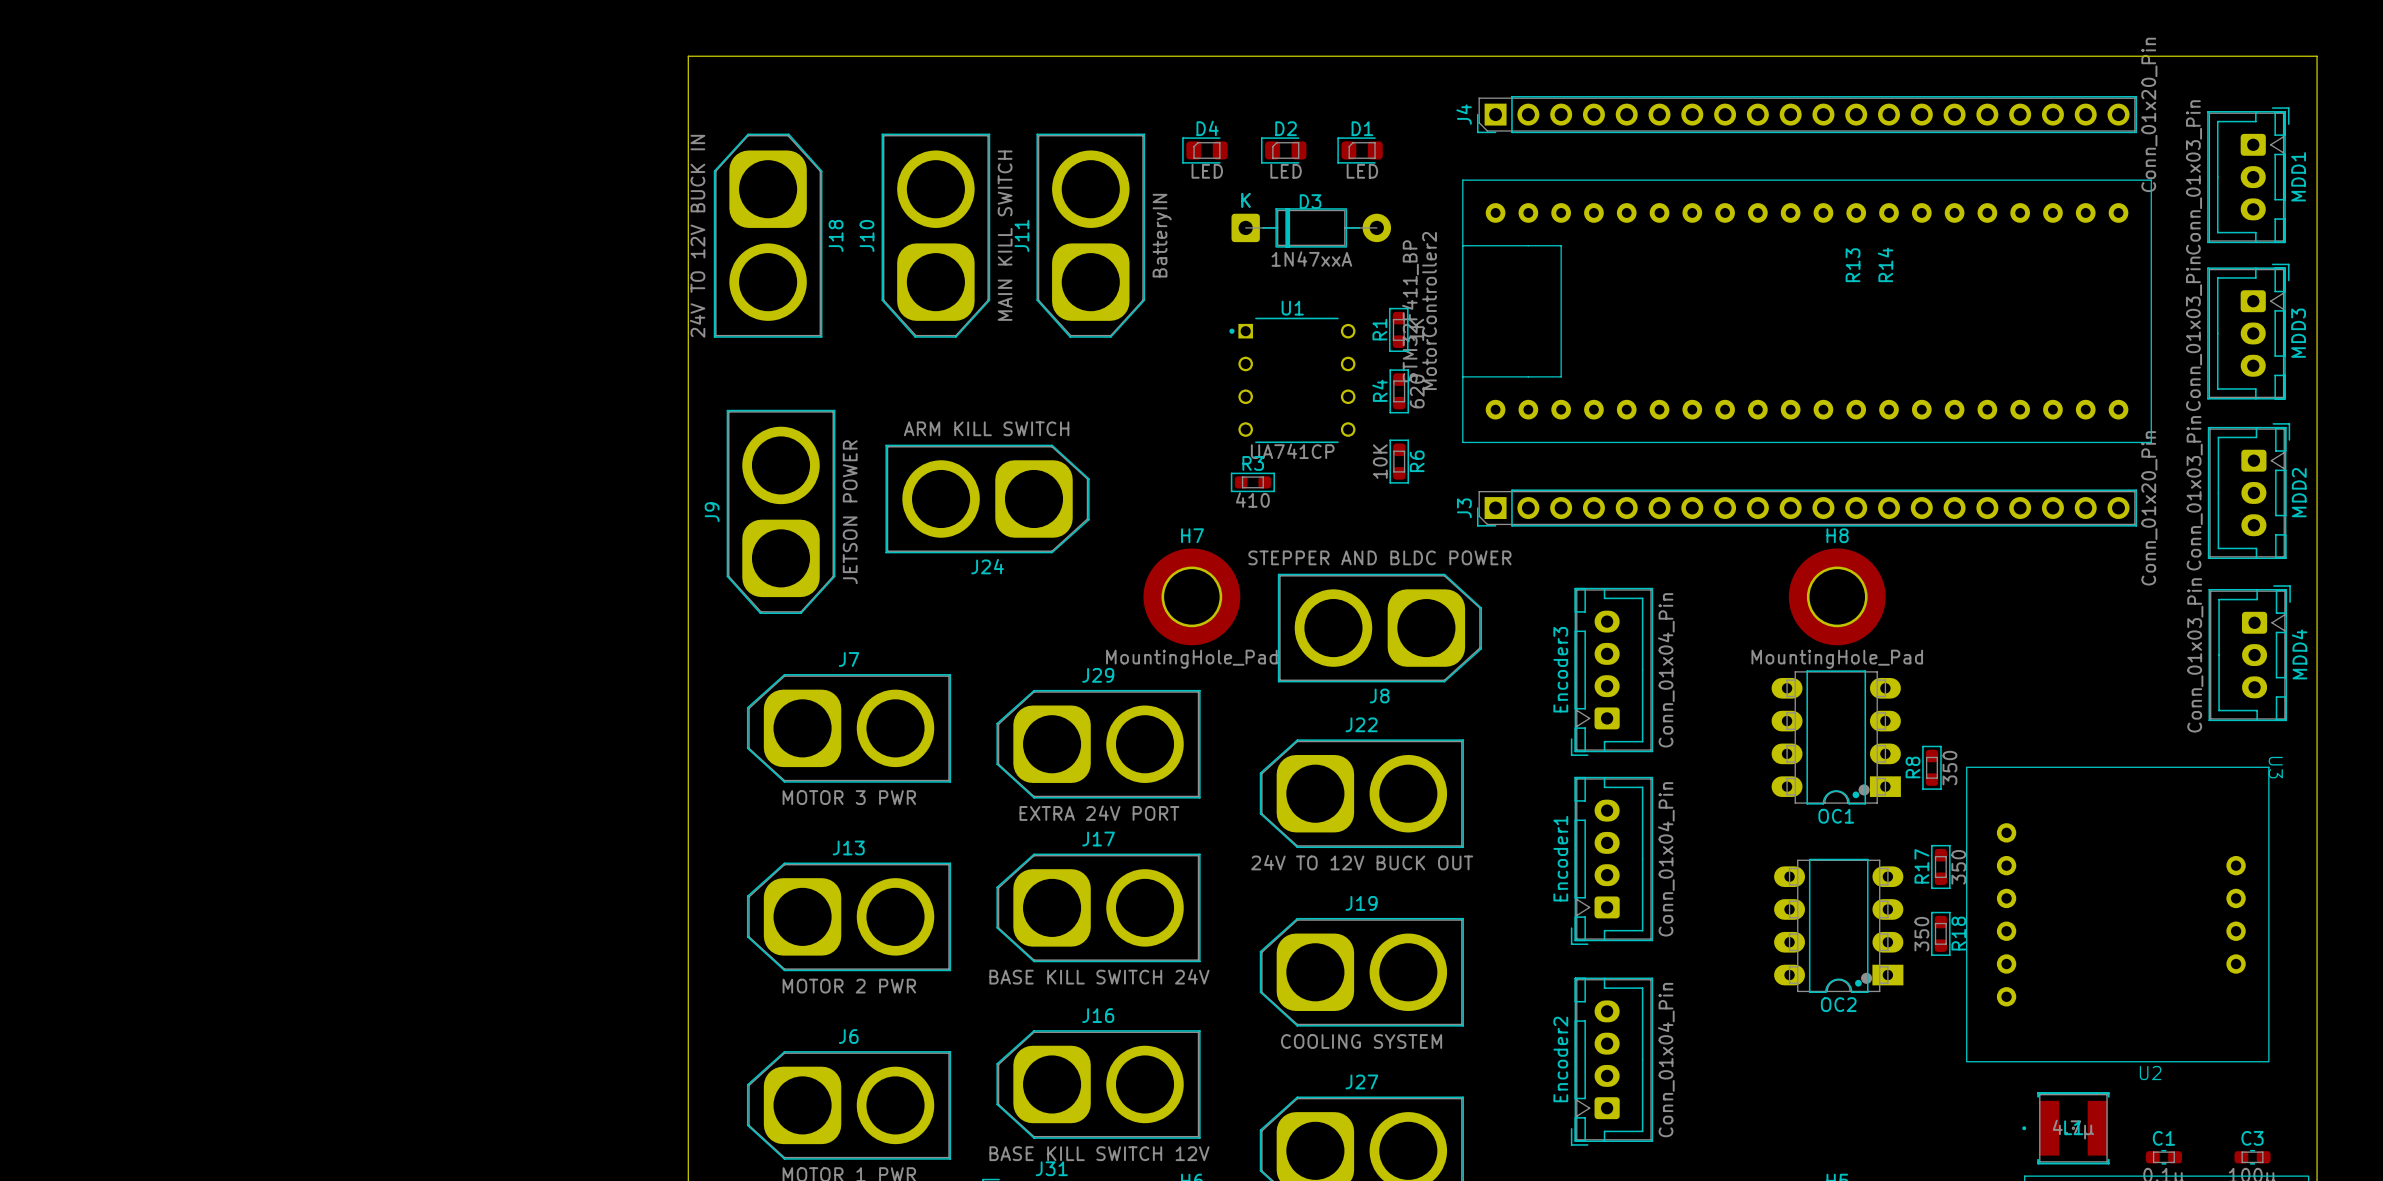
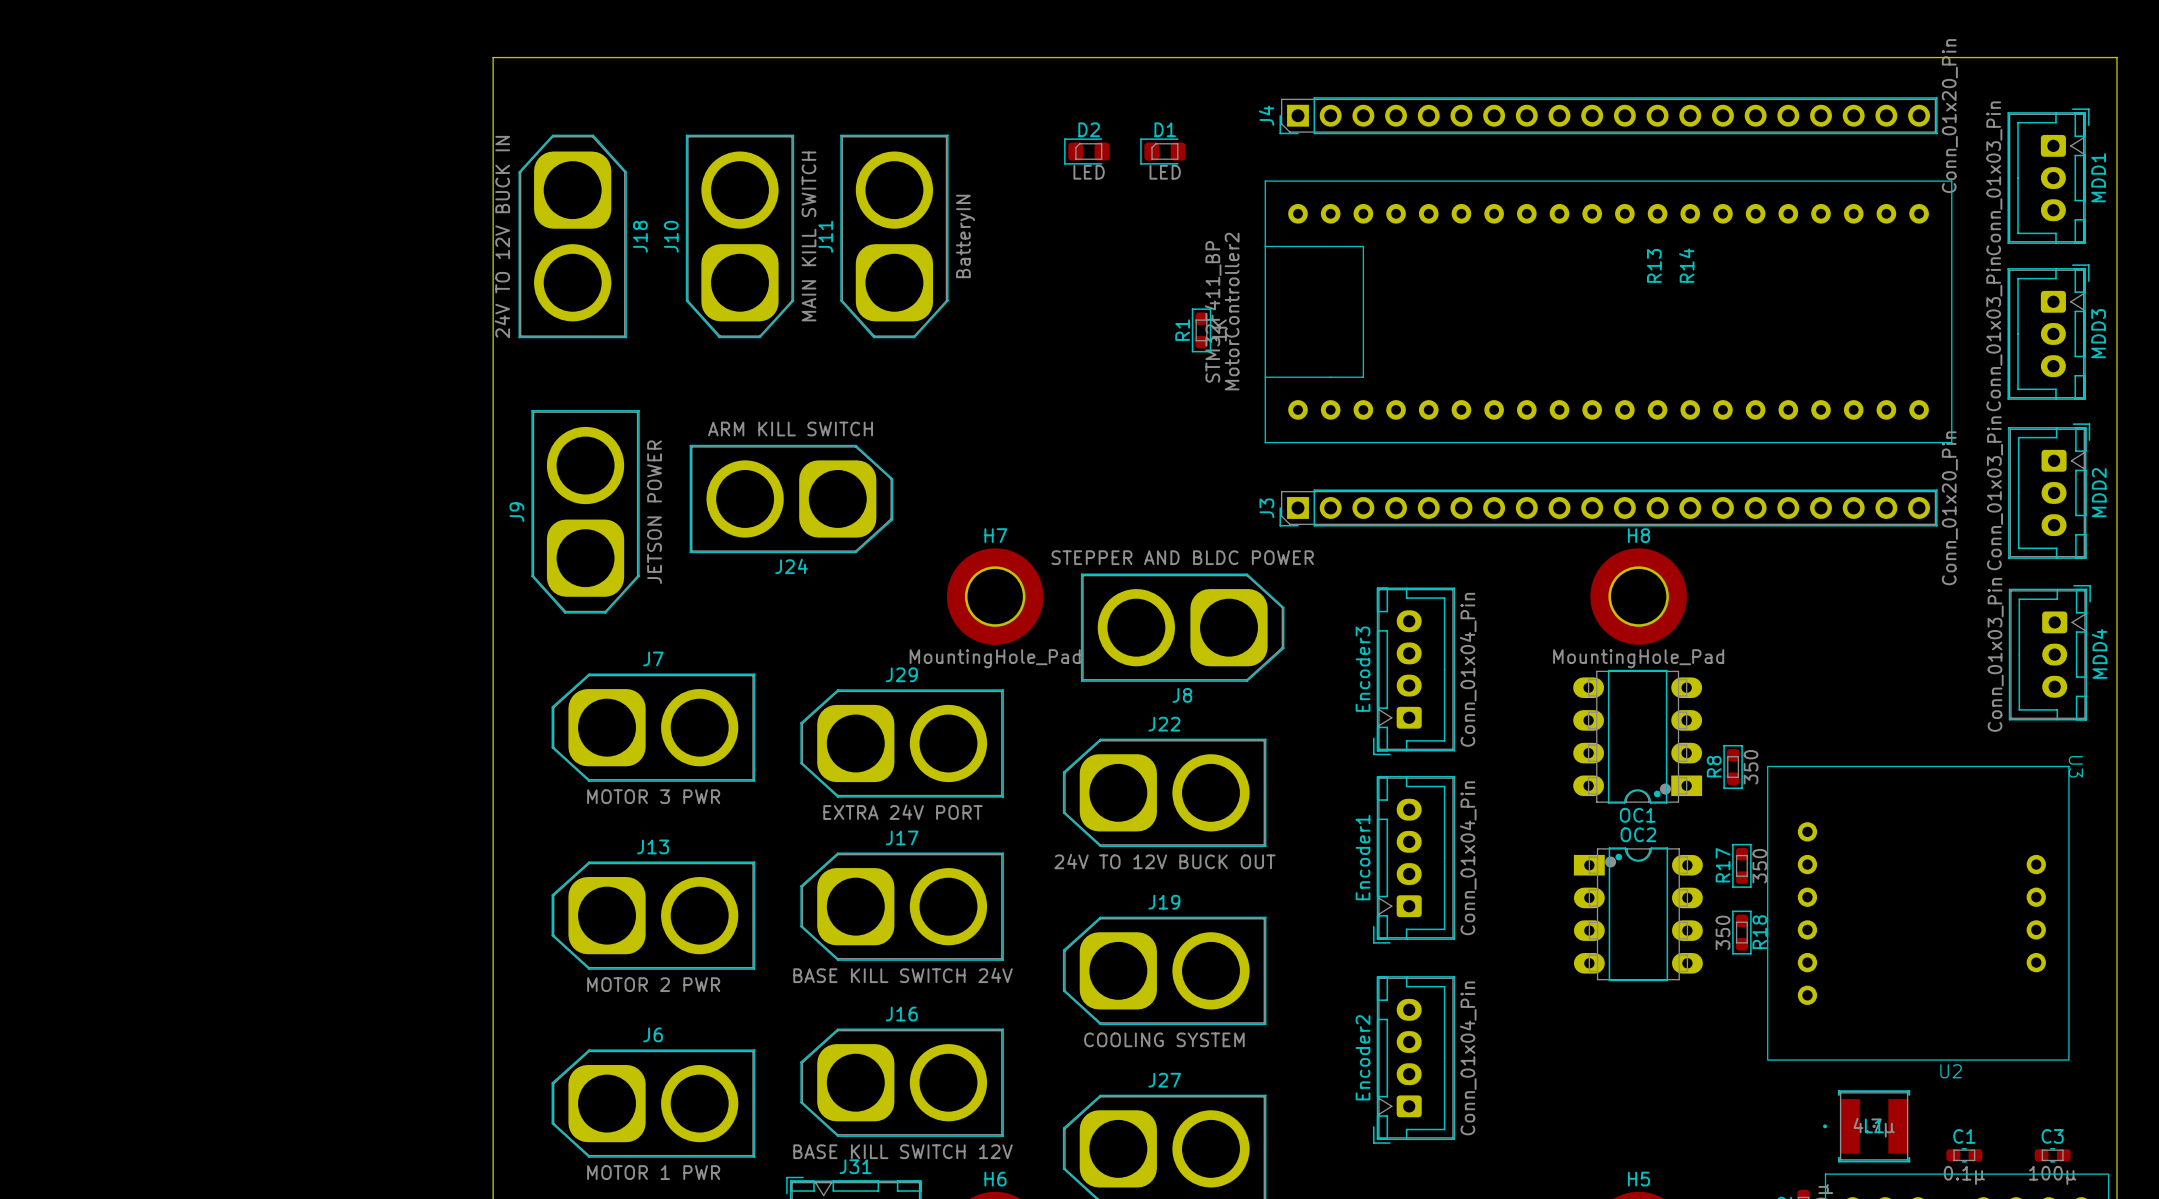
D4: LED (1204, 150) -> none
D3: 1N47xxA (1311, 227) -> none
U1: UA741CP (1292, 380) -> none
R4: 620 (1399, 391) -> none
R6: 10K (1399, 461) -> none
R3: 410 (1252, 482) -> none
OC2 rotation: 0° (1838, 925) -> 180° (1638, 914)

